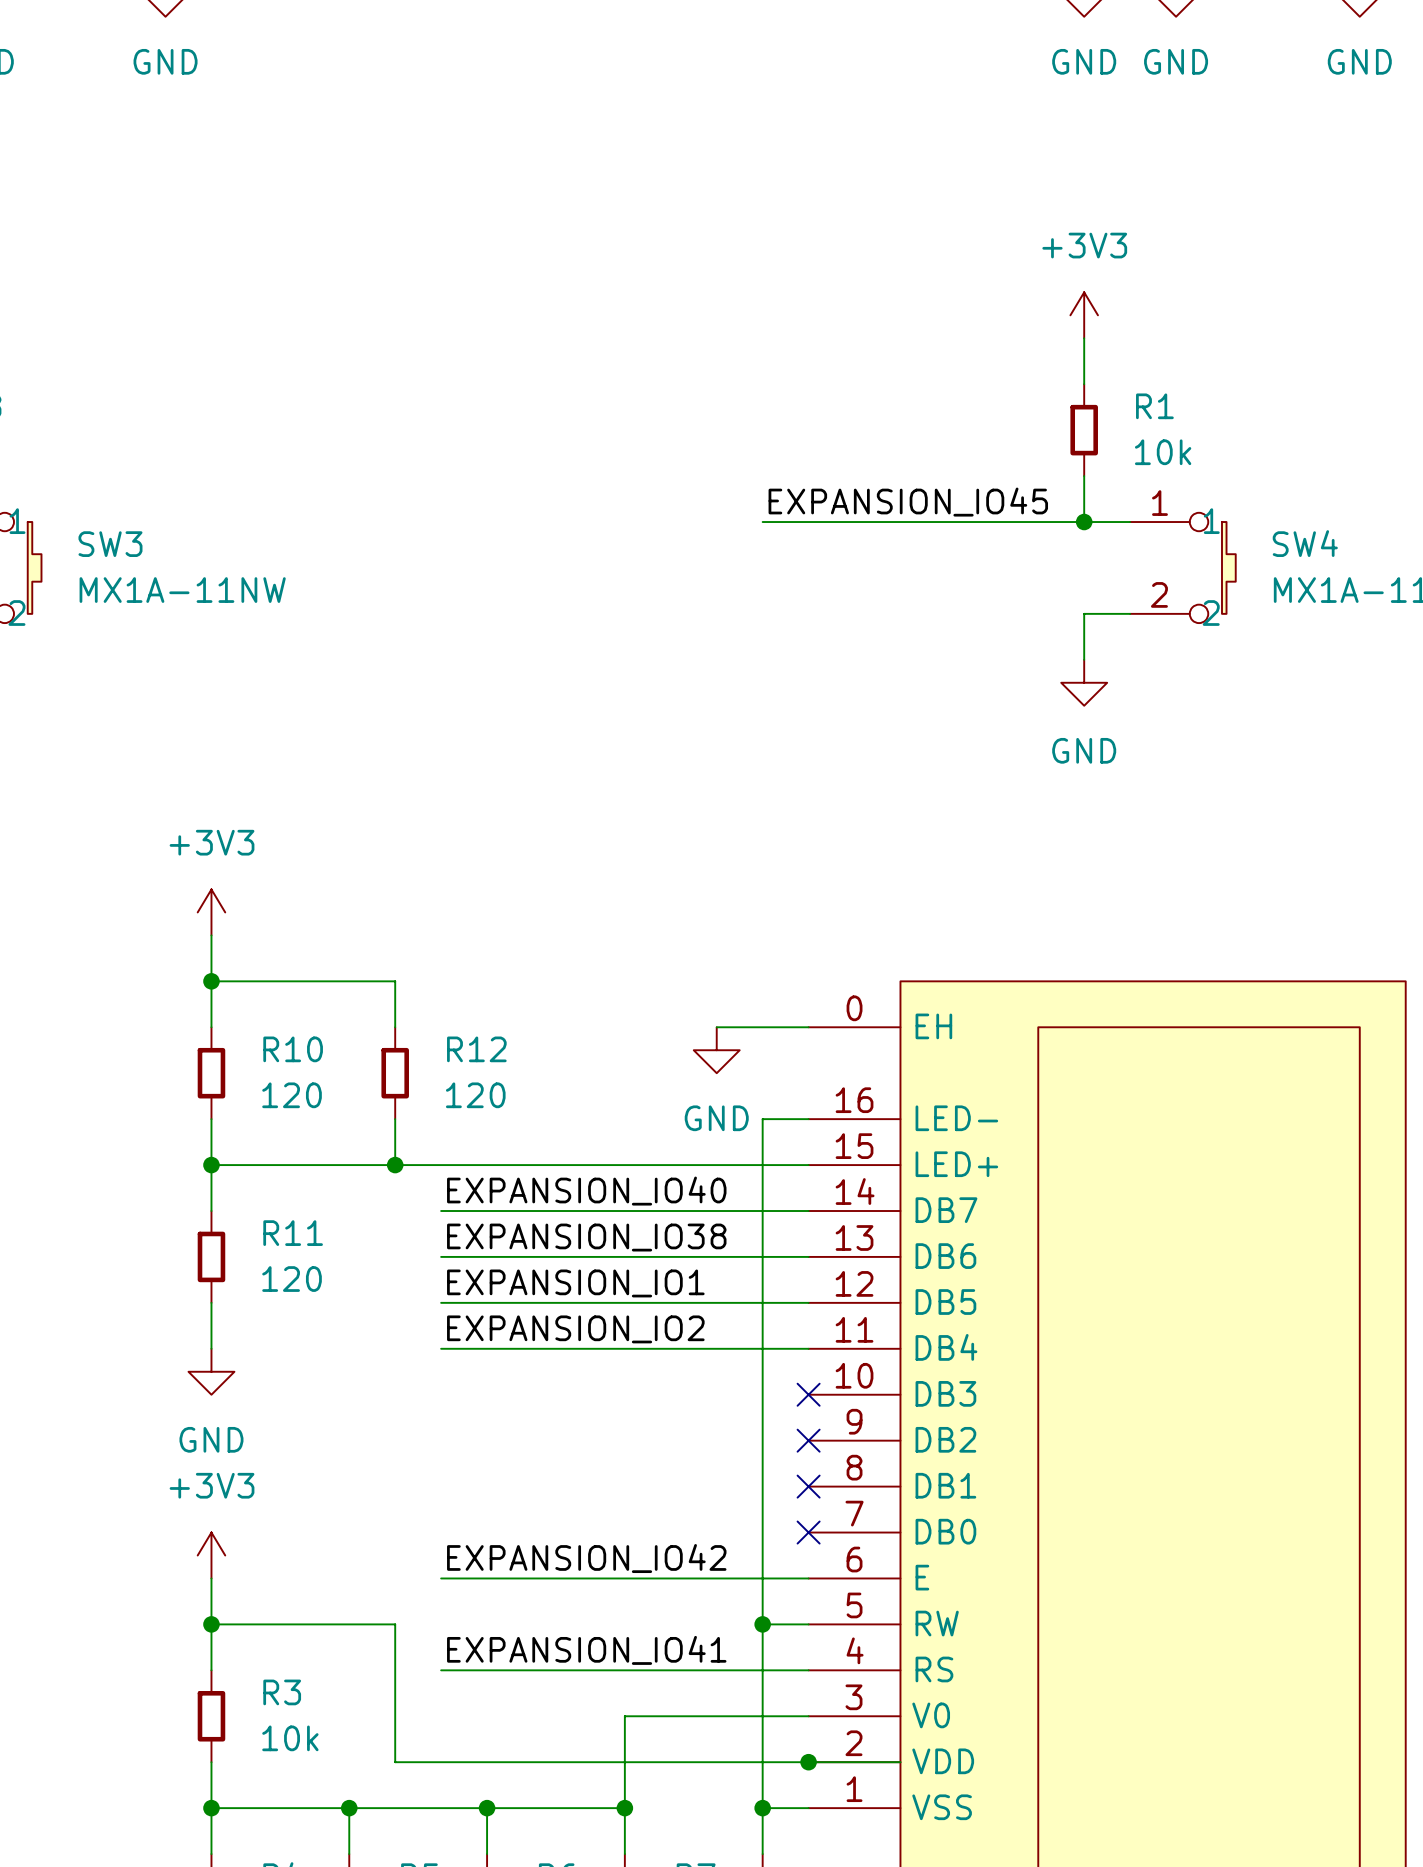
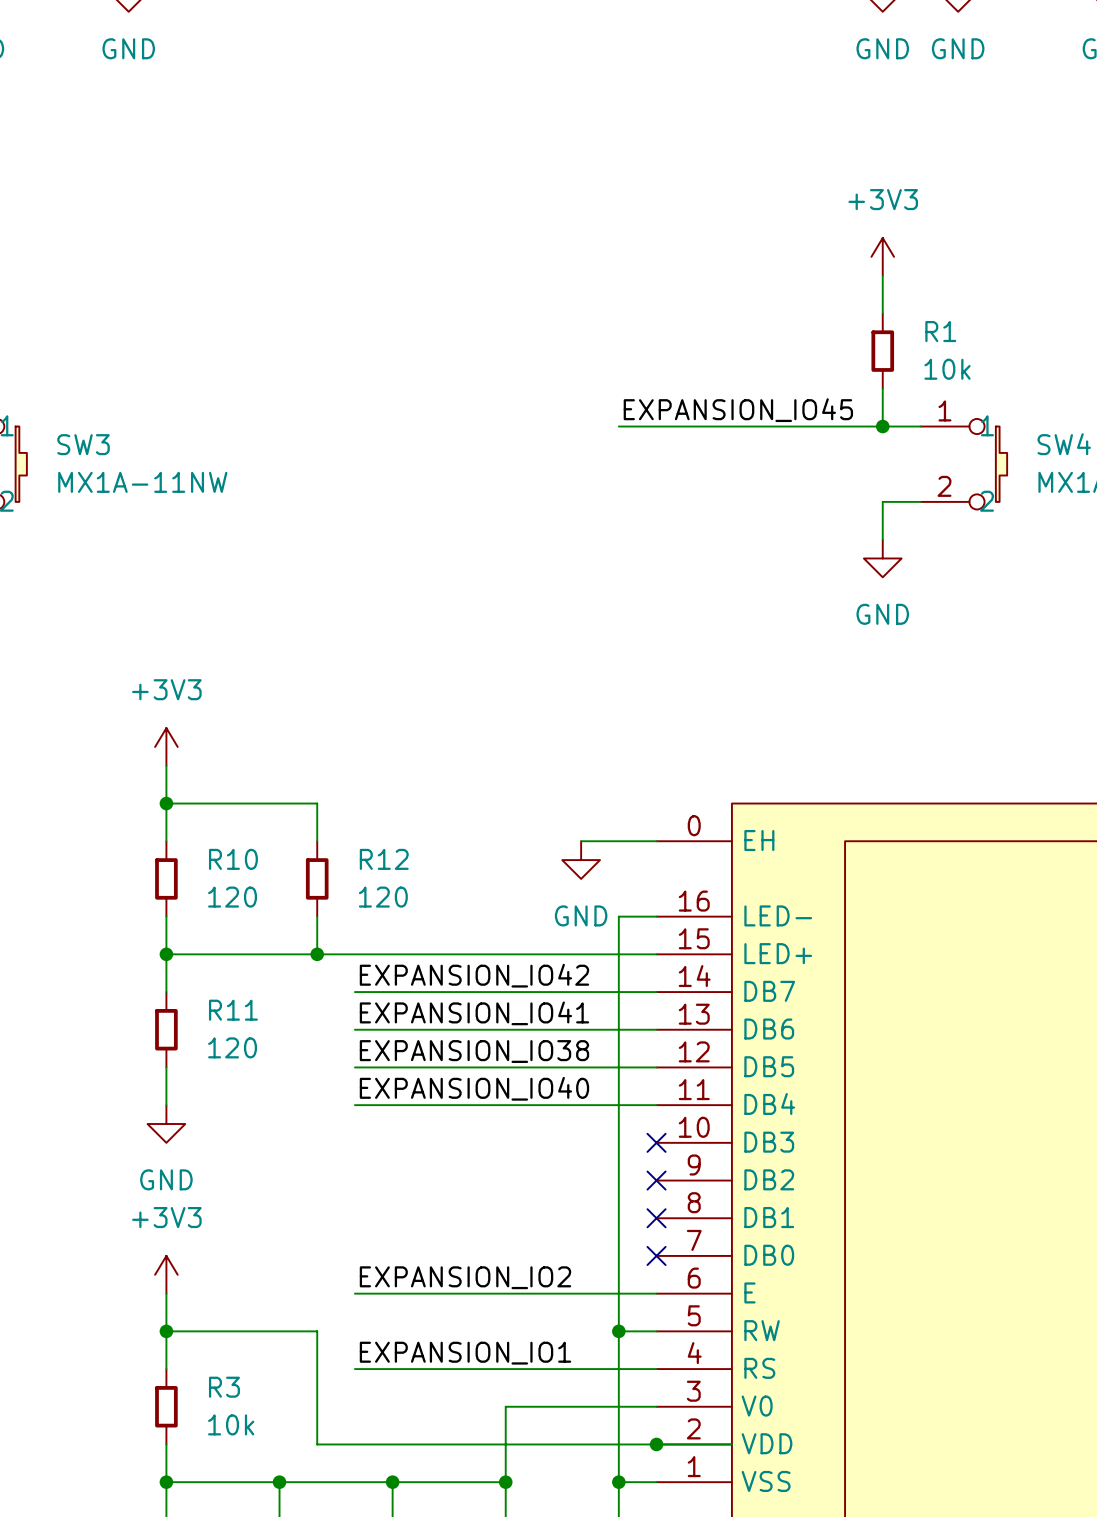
label: EXPANSION_IO40 (586, 1191) -> EXPANSION_IO42 (474, 975)
label: EXPANSION_IO38 (586, 1237) -> EXPANSION_IO41 (474, 1013)
label: EXPANSION_IO1 (575, 1283) -> EXPANSION_IO38 (474, 1051)
label: EXPANSION_IO2 (575, 1329) -> EXPANSION_IO40 (474, 1088)
label: EXPANSION_IO42 (586, 1558) -> EXPANSION_IO2 (465, 1277)
label: EXPANSION_IO41 (586, 1650) -> EXPANSION_IO1 (465, 1353)

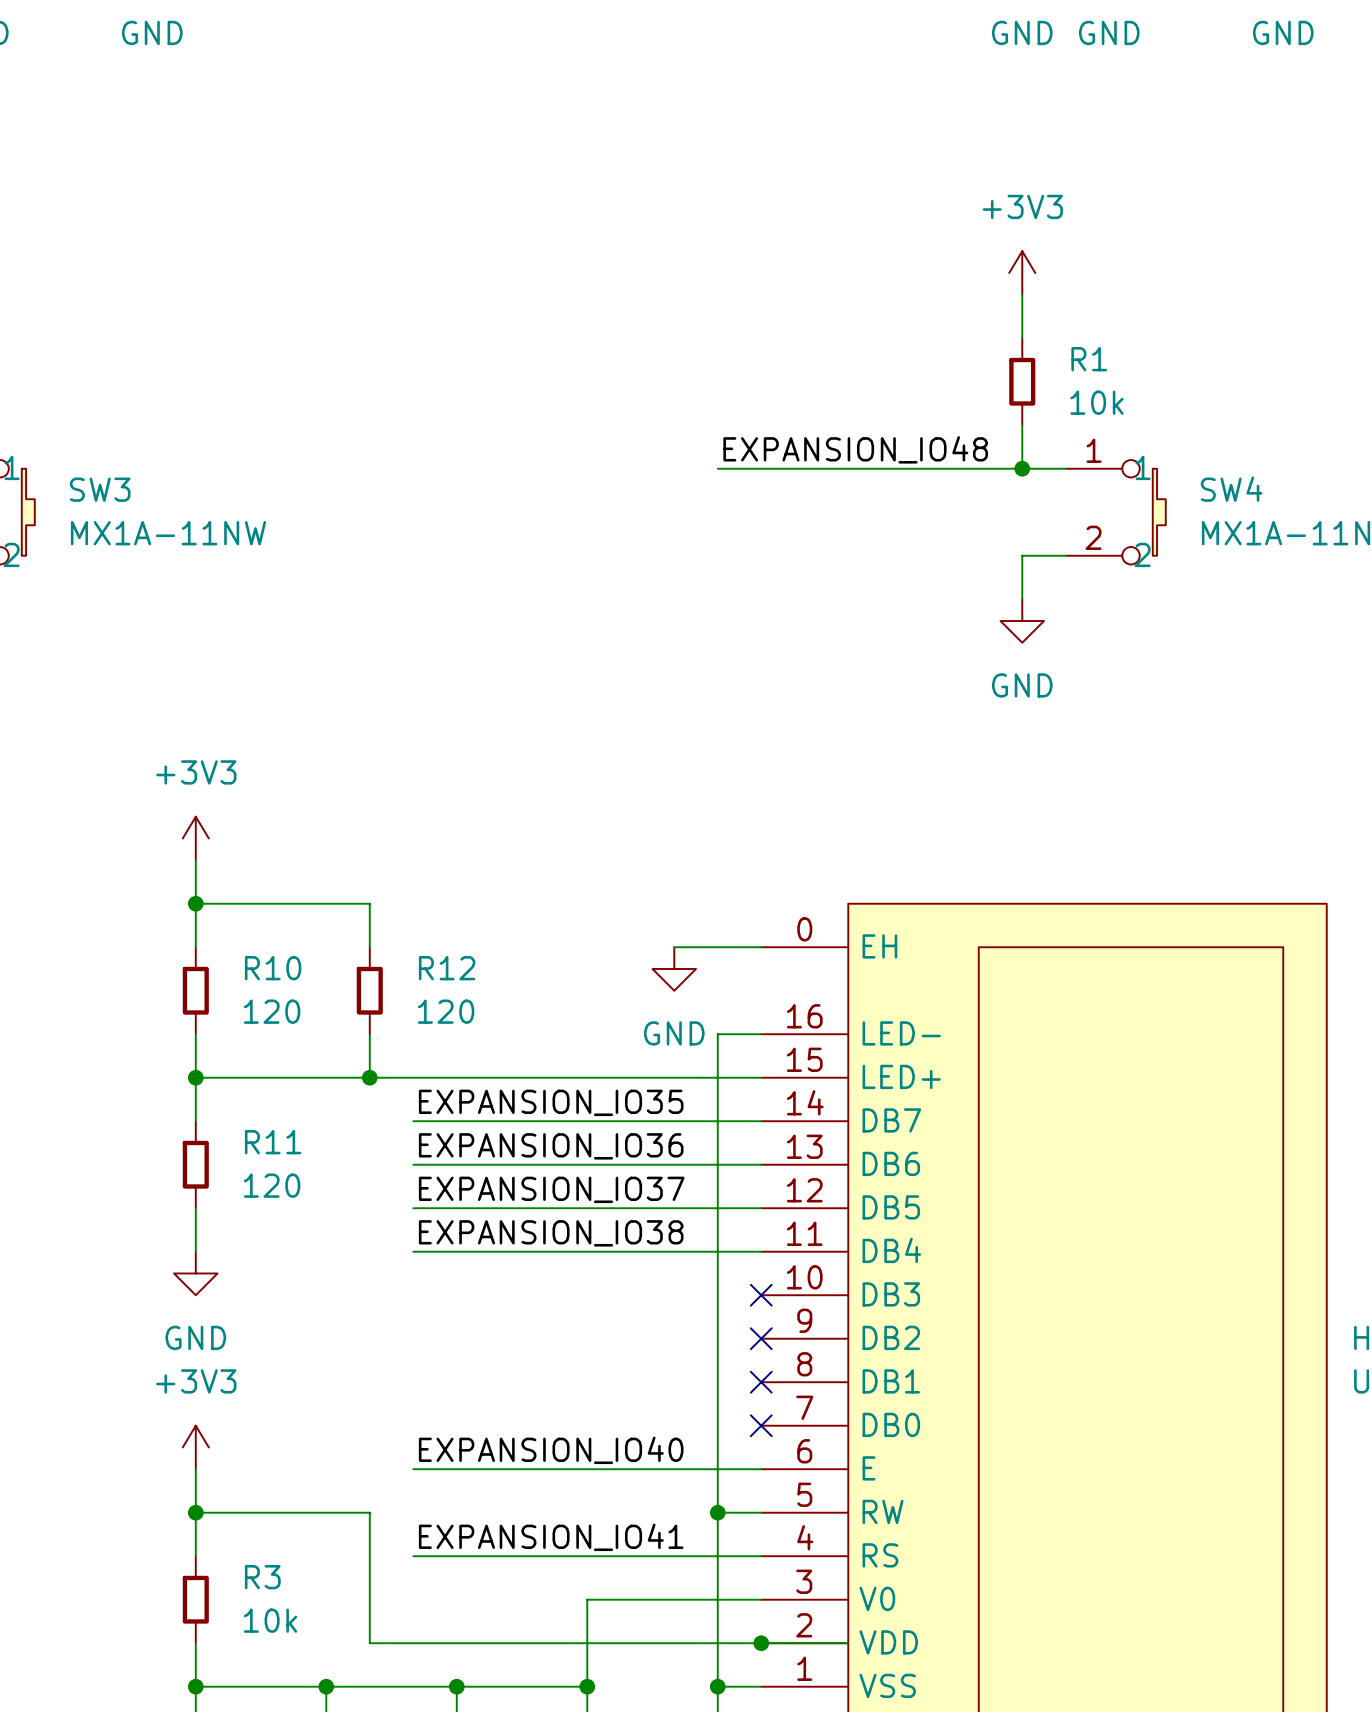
label: EXPANSION_IO45 (738, 410) -> EXPANSION_IO48 (855, 449)
label: EXPANSION_IO42 (474, 975) -> EXPANSION_IO35 (551, 1102)
label: EXPANSION_IO41 (474, 1013) -> EXPANSION_IO36 (551, 1146)
label: EXPANSION_IO38 (474, 1051) -> EXPANSION_IO37 (551, 1189)
label: EXPANSION_IO40 (474, 1088) -> EXPANSION_IO38 (551, 1233)
label: EXPANSION_IO2 (465, 1277) -> EXPANSION_IO40 (551, 1450)
label: EXPANSION_IO1 (465, 1353) -> EXPANSION_IO41 (551, 1537)

